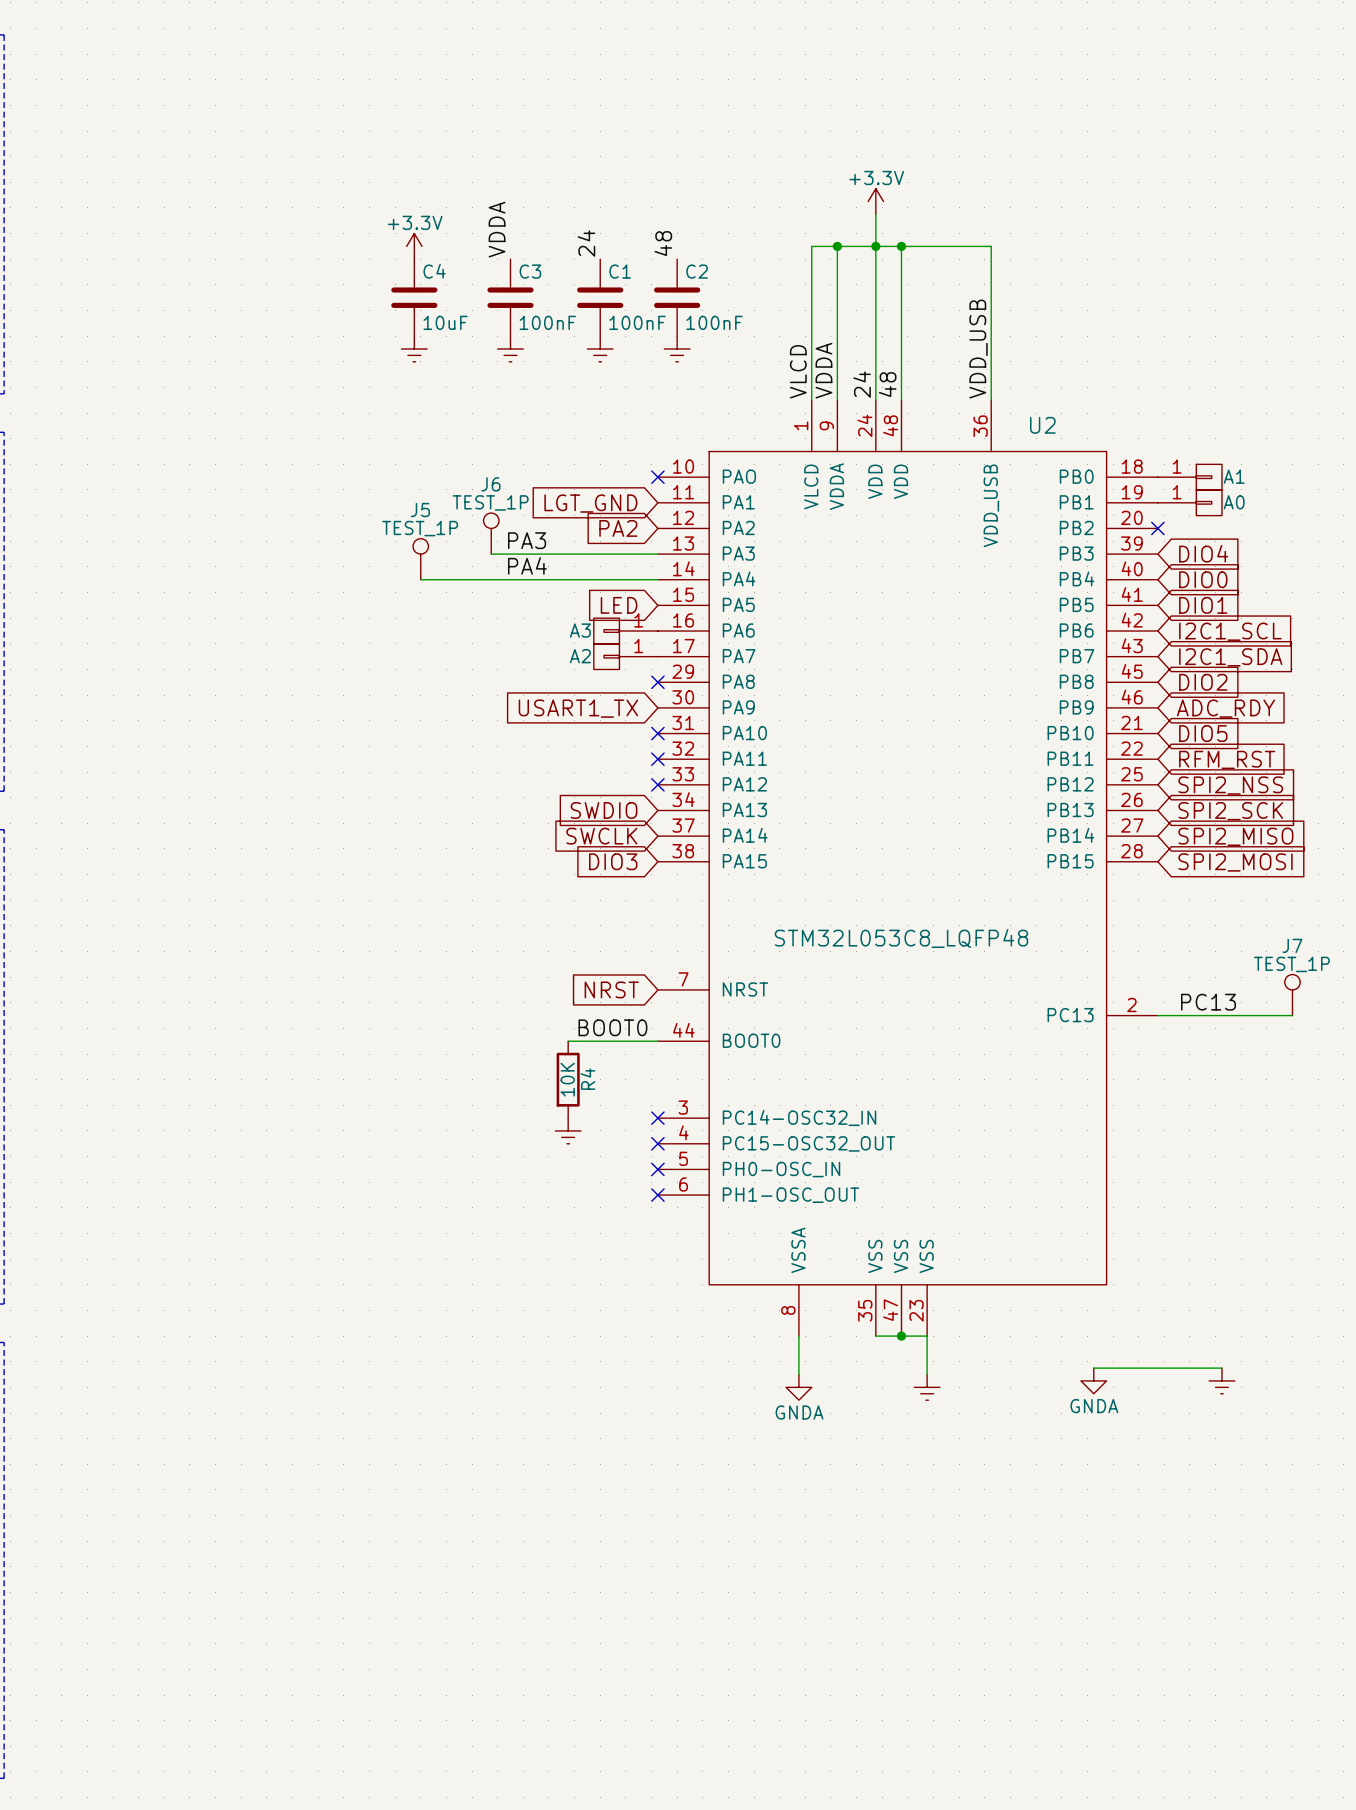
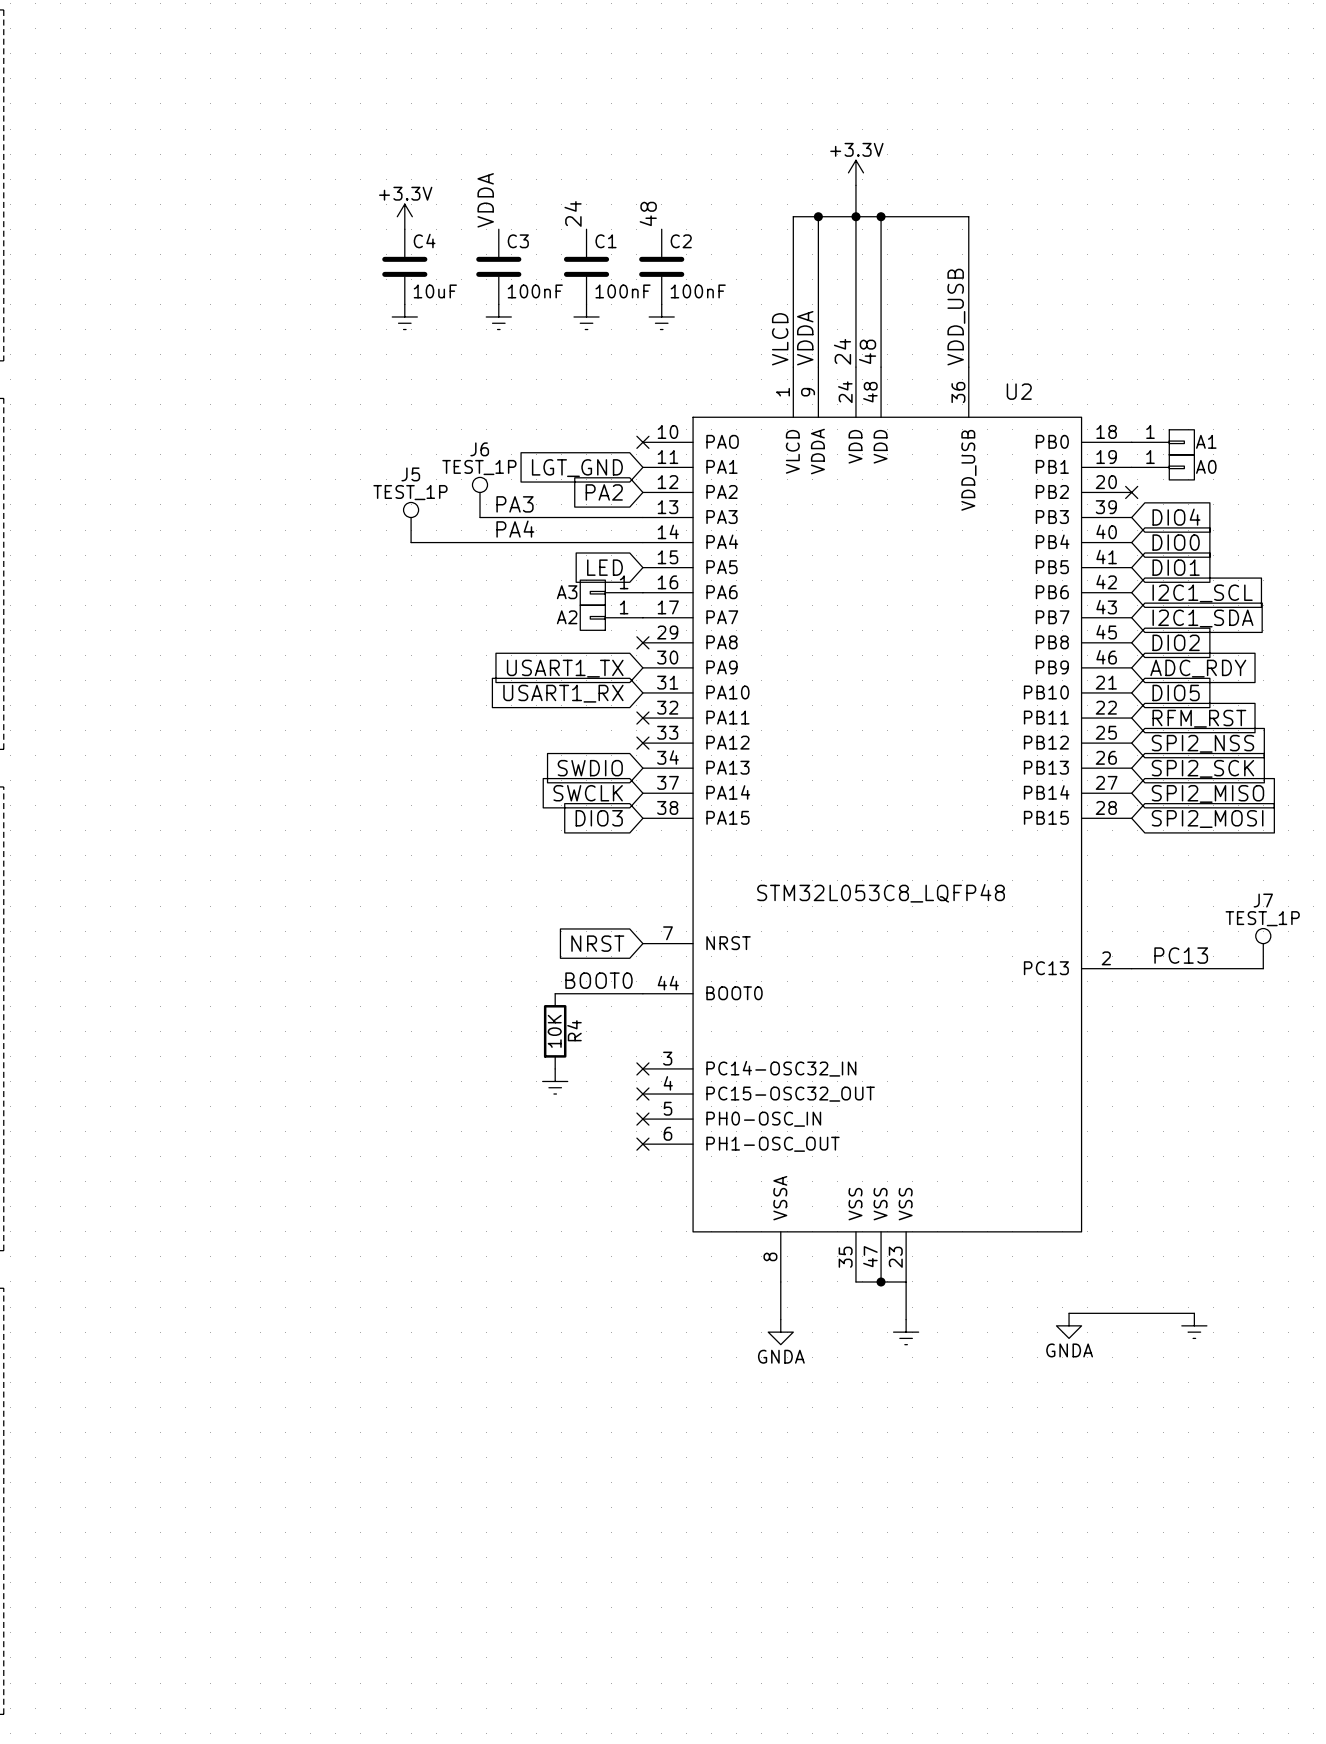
no-connect mark: (657, 733) -> none
global label: none -> USART1_RX (563, 693)

